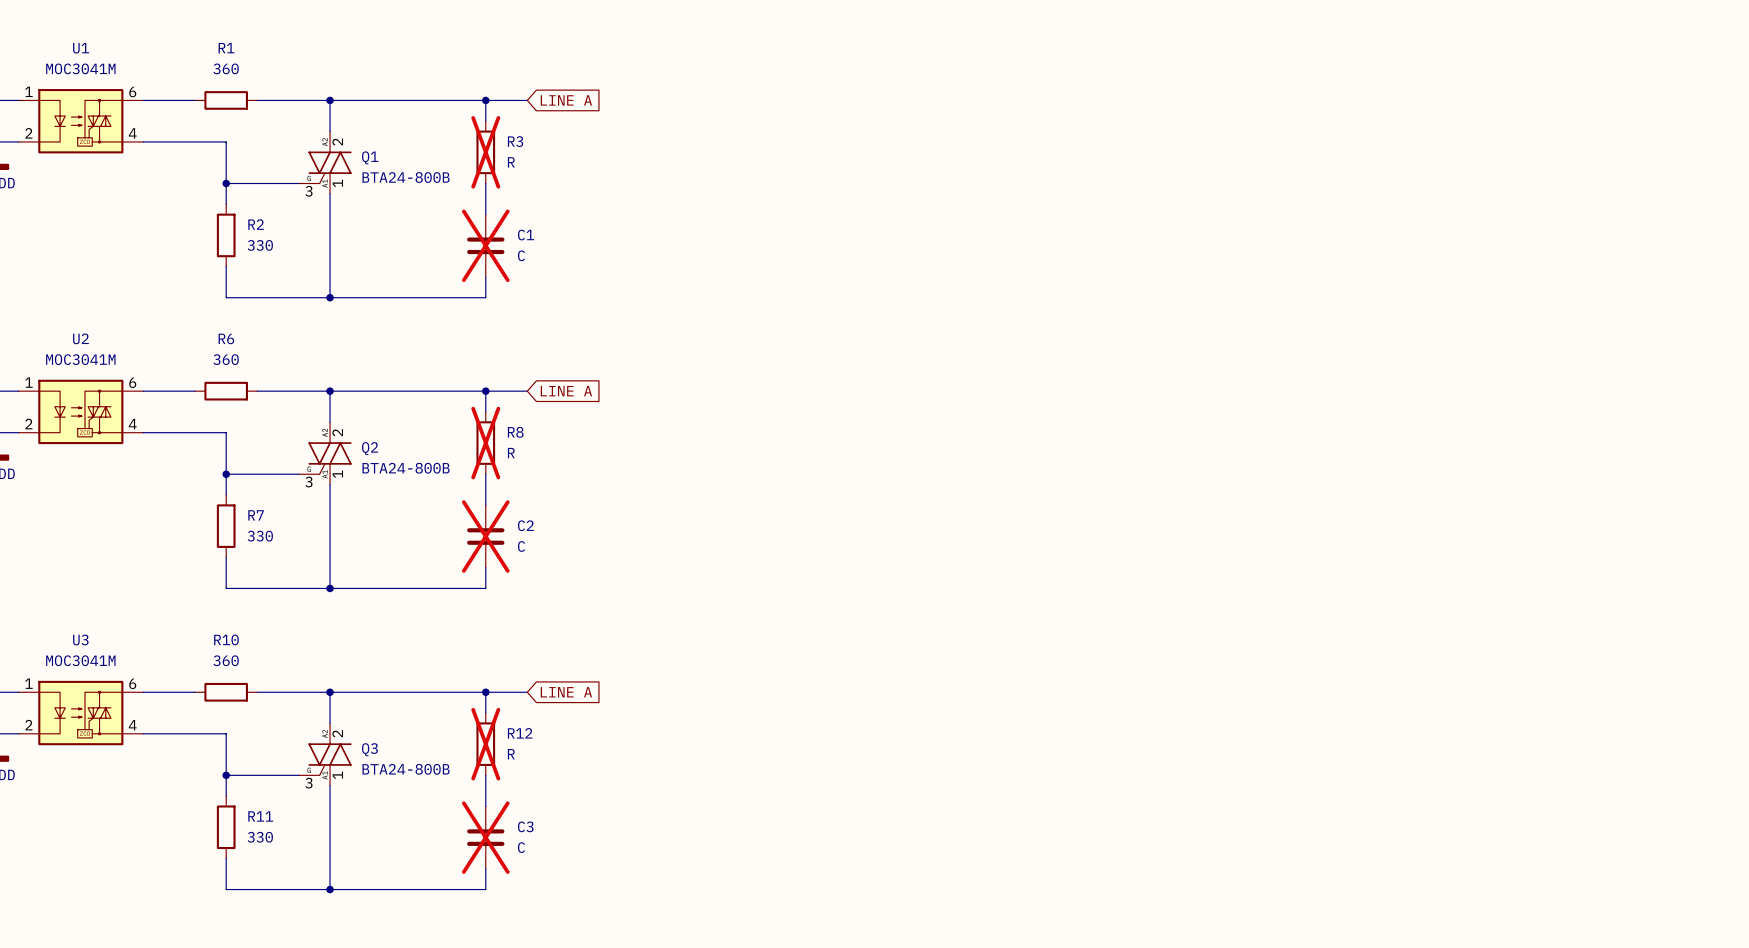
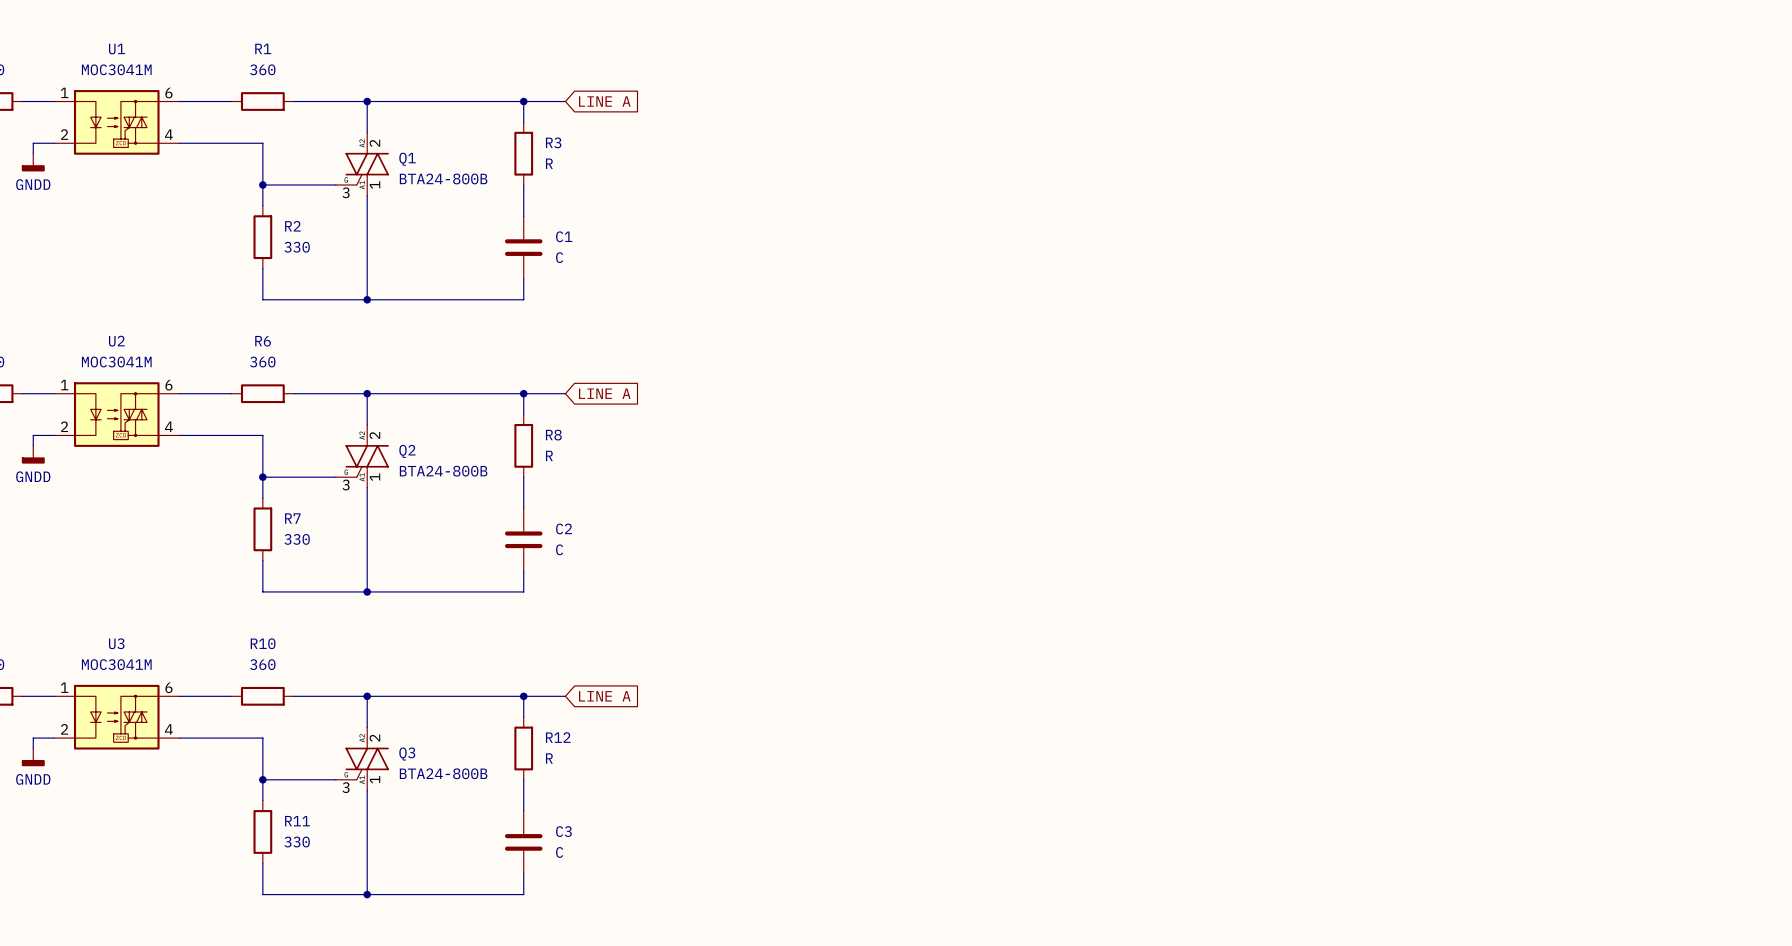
R3 do-not-place cross: (485, 152) -> none
C1 do-not-place cross: (485, 245) -> none
R8 do-not-place cross: (485, 443) -> none
C2 do-not-place cross: (485, 536) -> none
R12 do-not-place cross: (485, 744) -> none
C3 do-not-place cross: (485, 837) -> none

